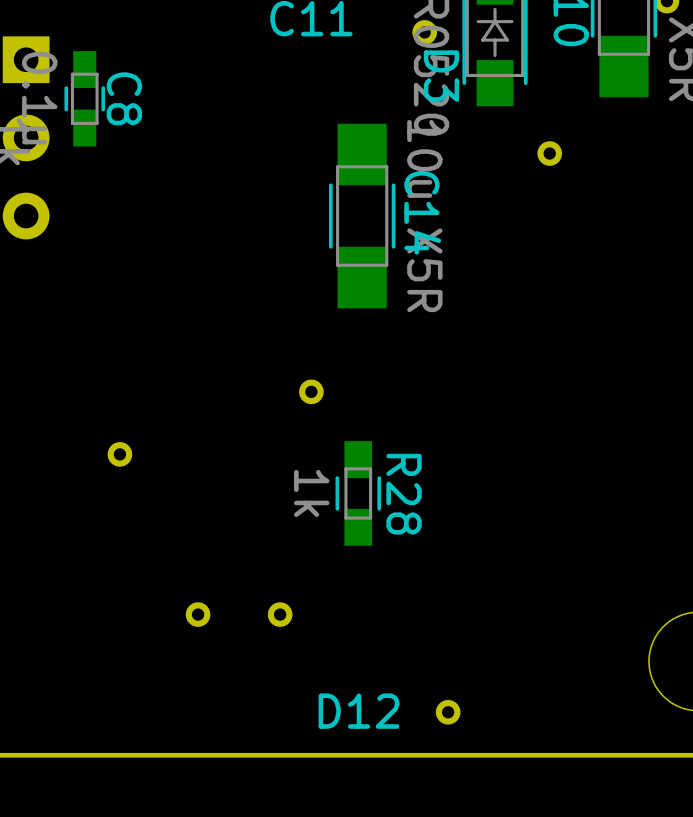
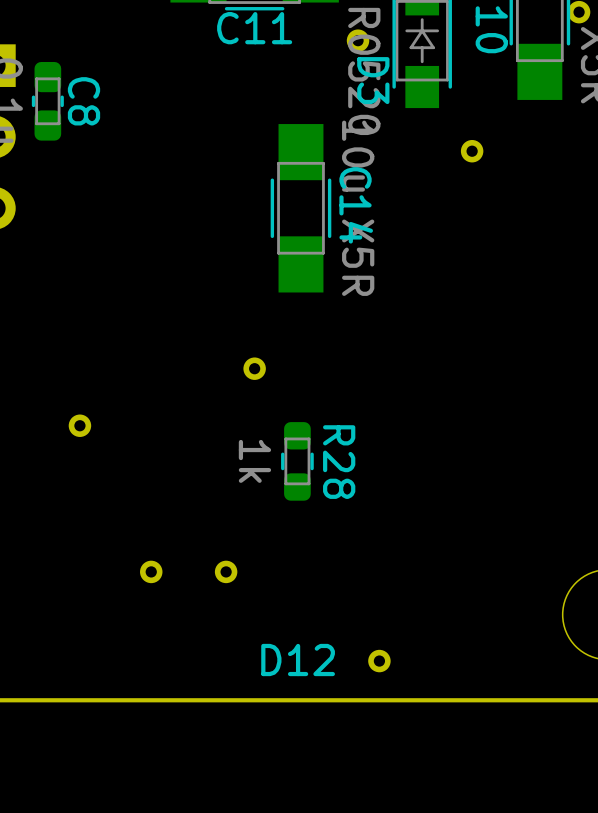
C8 footprint: [64, 51, 106, 147] -> [31, 62, 64, 141]
R28 footprint: [335, 441, 382, 546] -> [281, 422, 314, 501]

